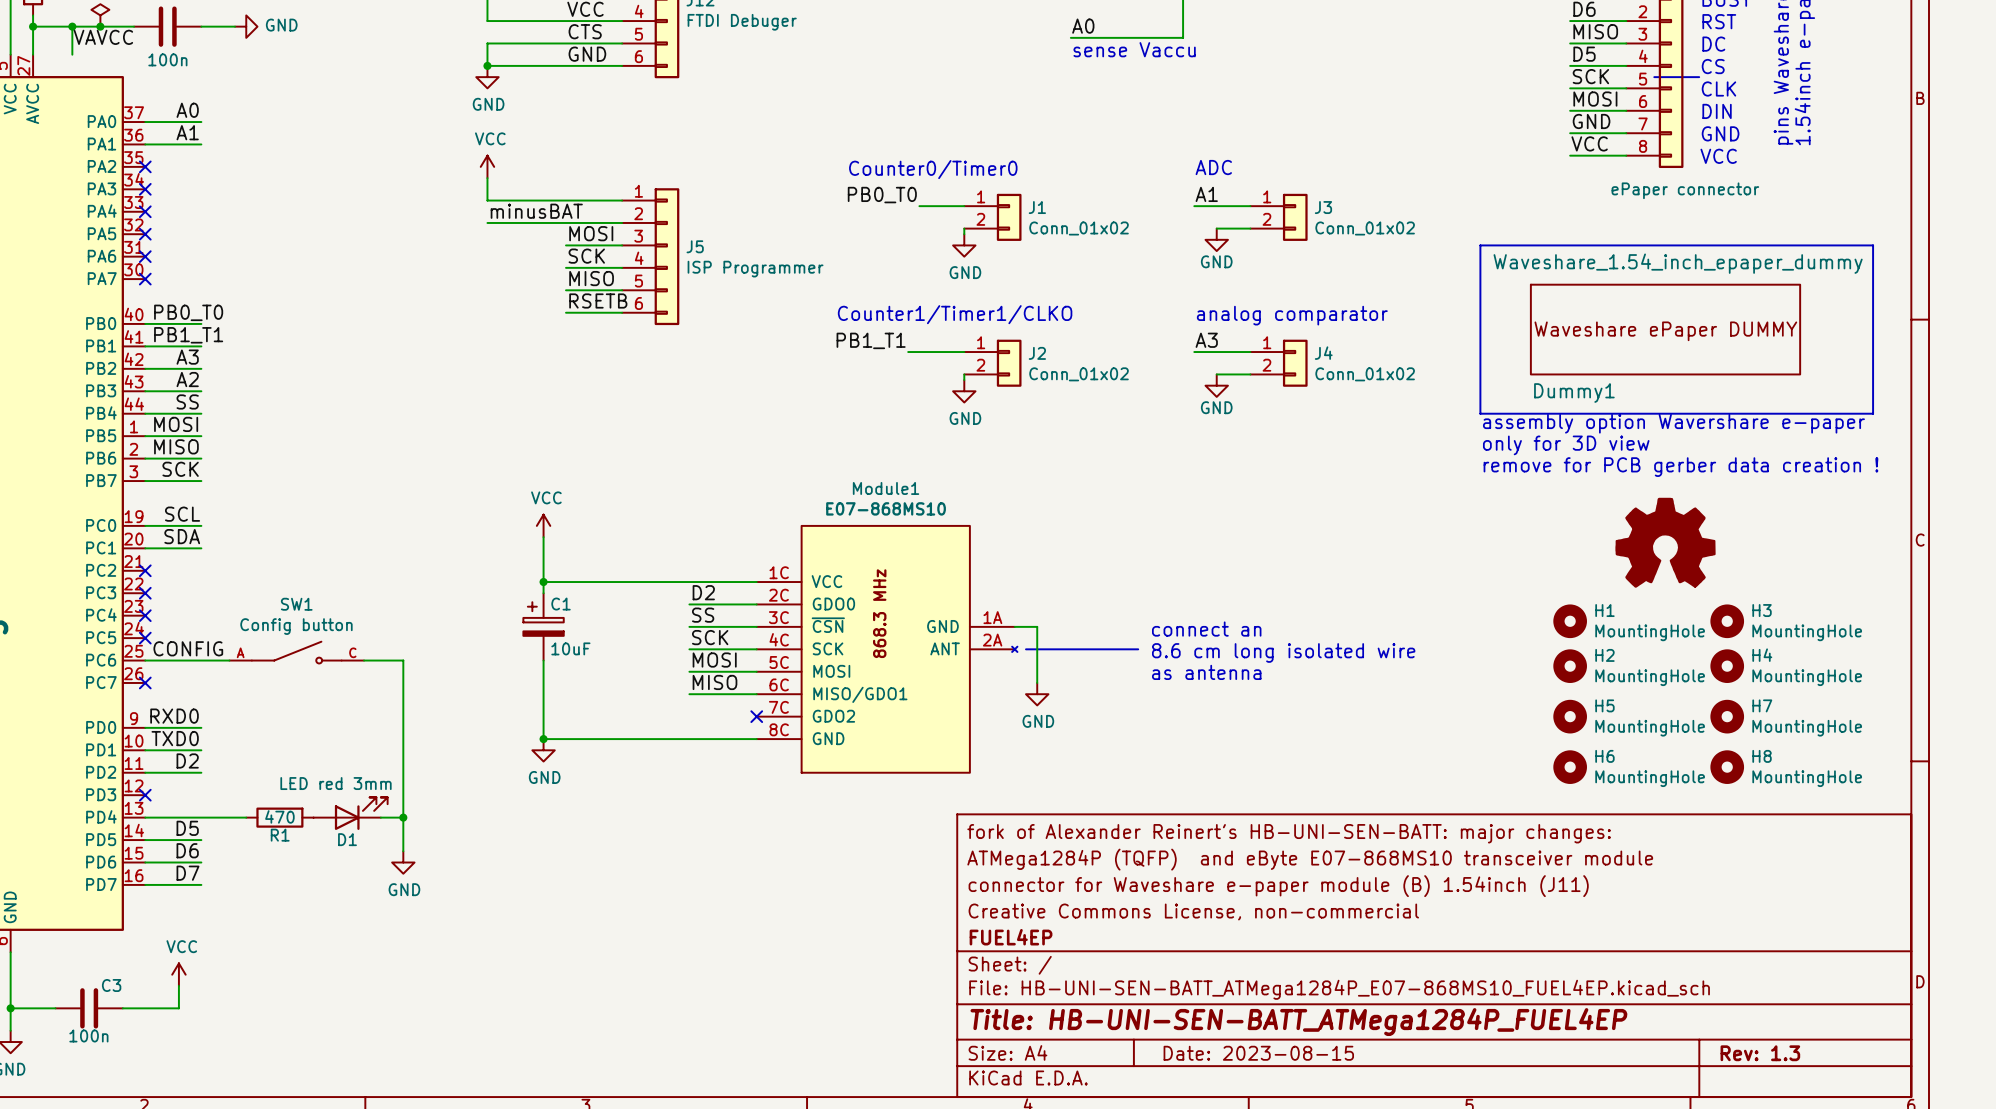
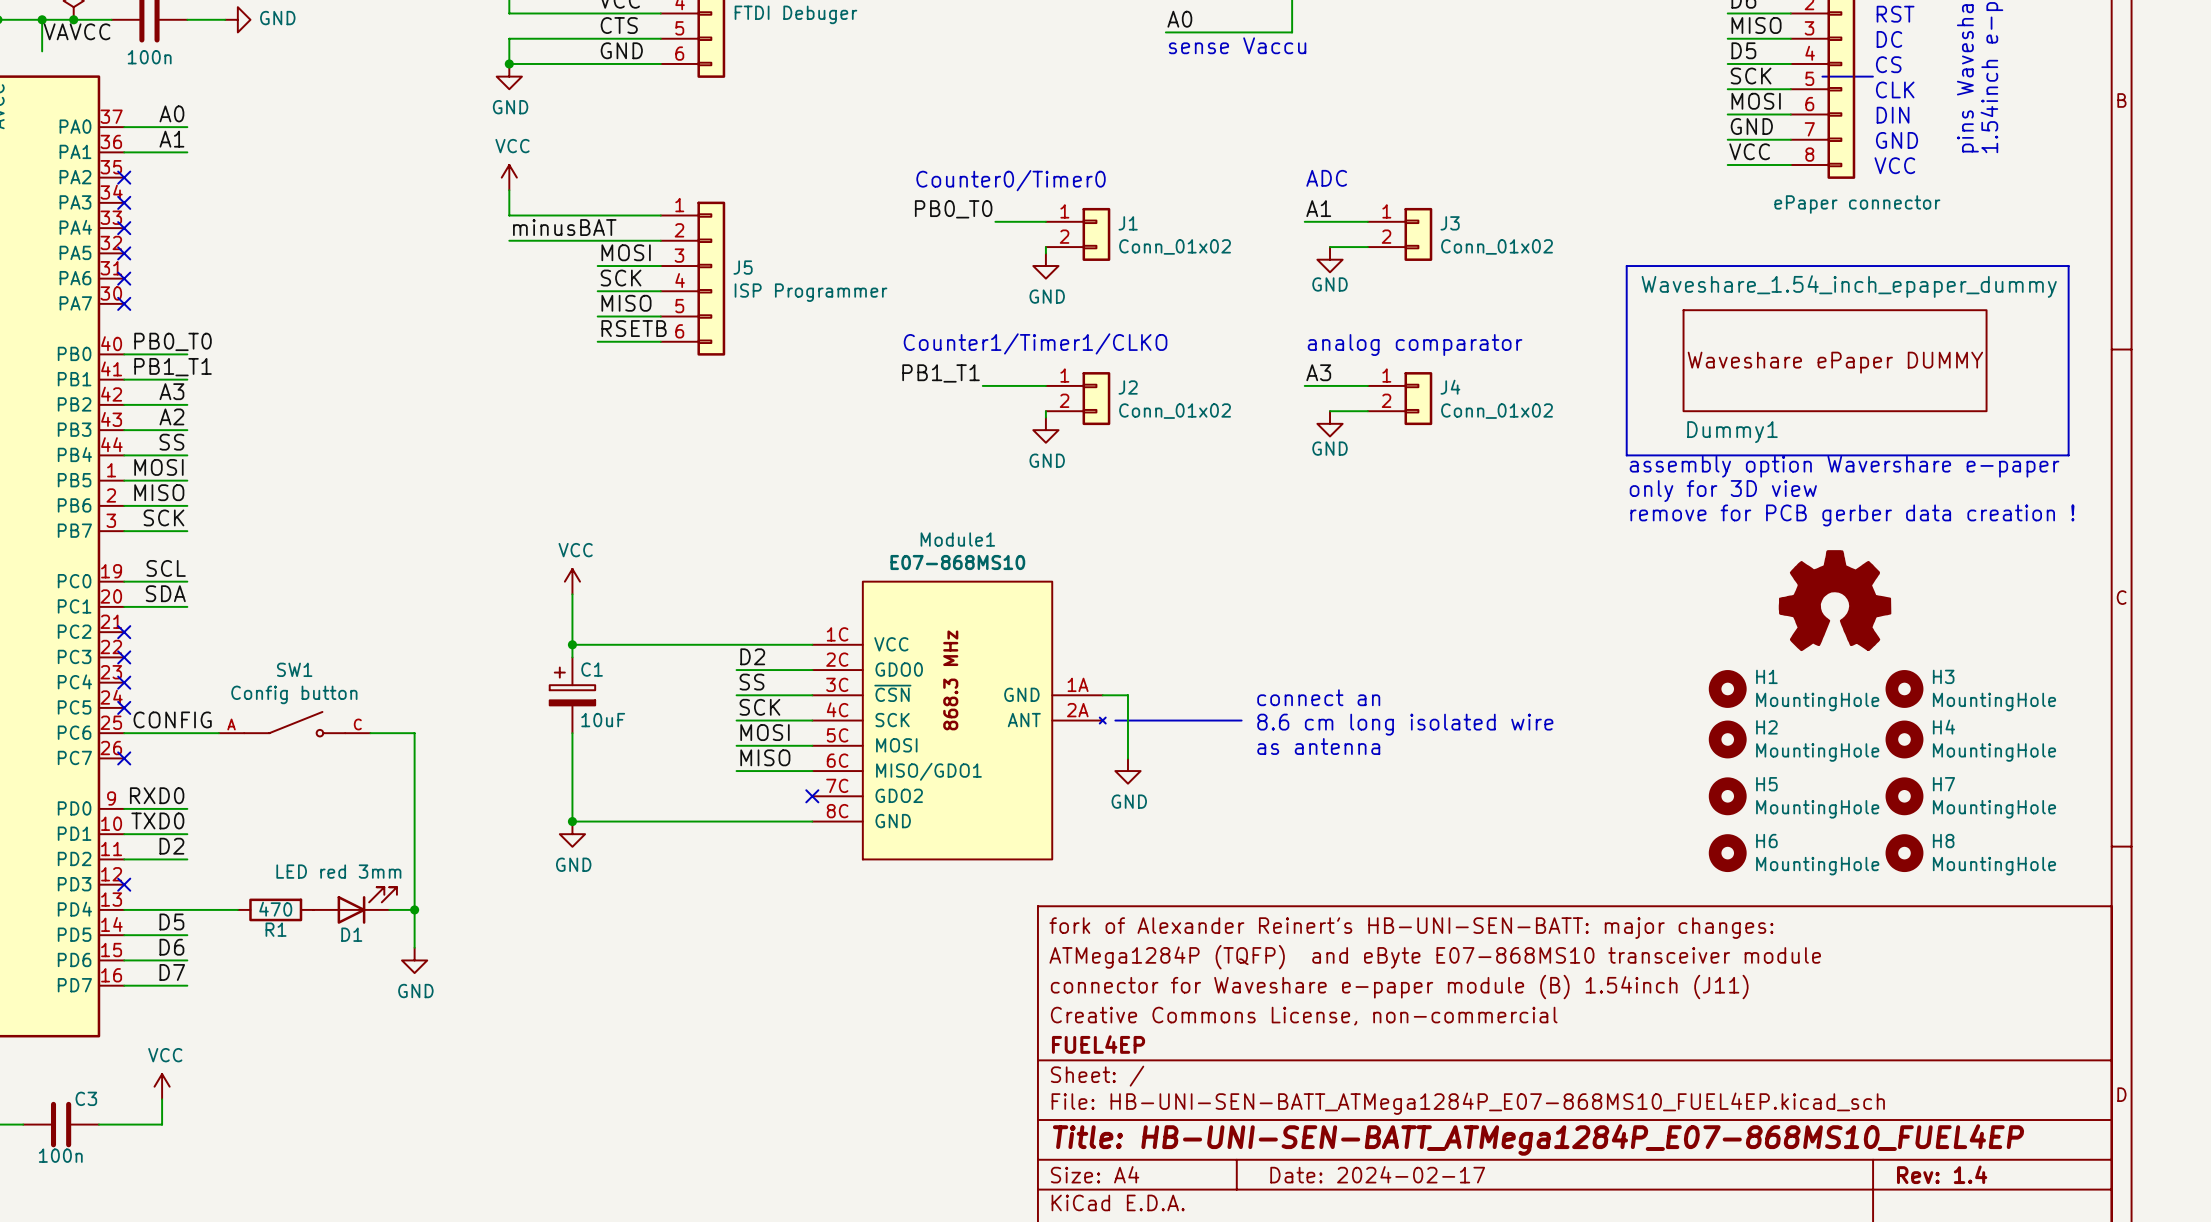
title block: Title: HB-UNI-SEN-BATT_ATMega1284P_FUEL4EP (1298, 1022) -> Title: HB-UNI-SEN-BATT_ATMega1284P_E07-868MS10_FUEL4EP (1538, 1139)
title block: Date: 2023-08-15 (1258, 1053) -> Date: 2024-02-17 (1377, 1174)
title block: Rev: 1.3 (1760, 1053) -> Rev: 1.4 (1942, 1174)

